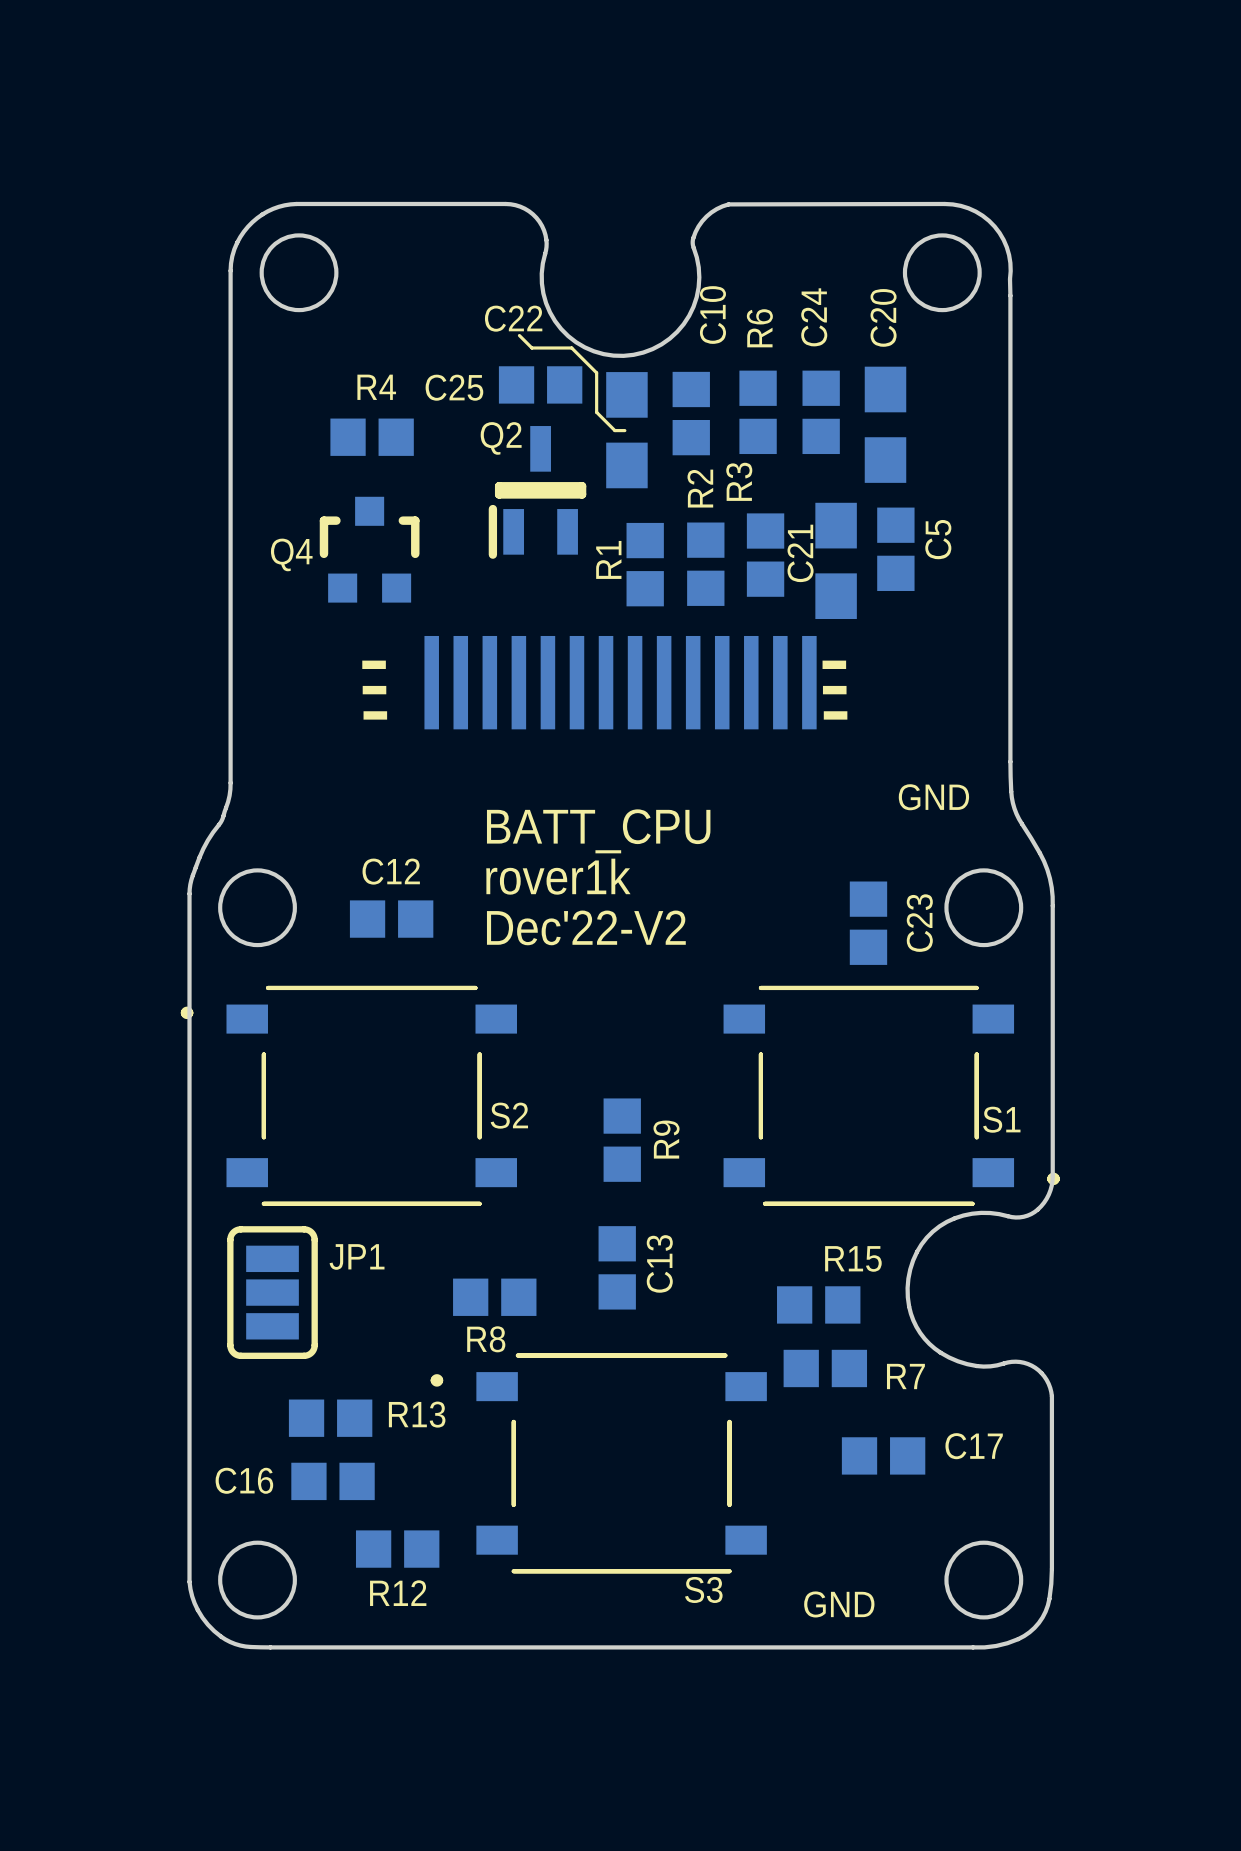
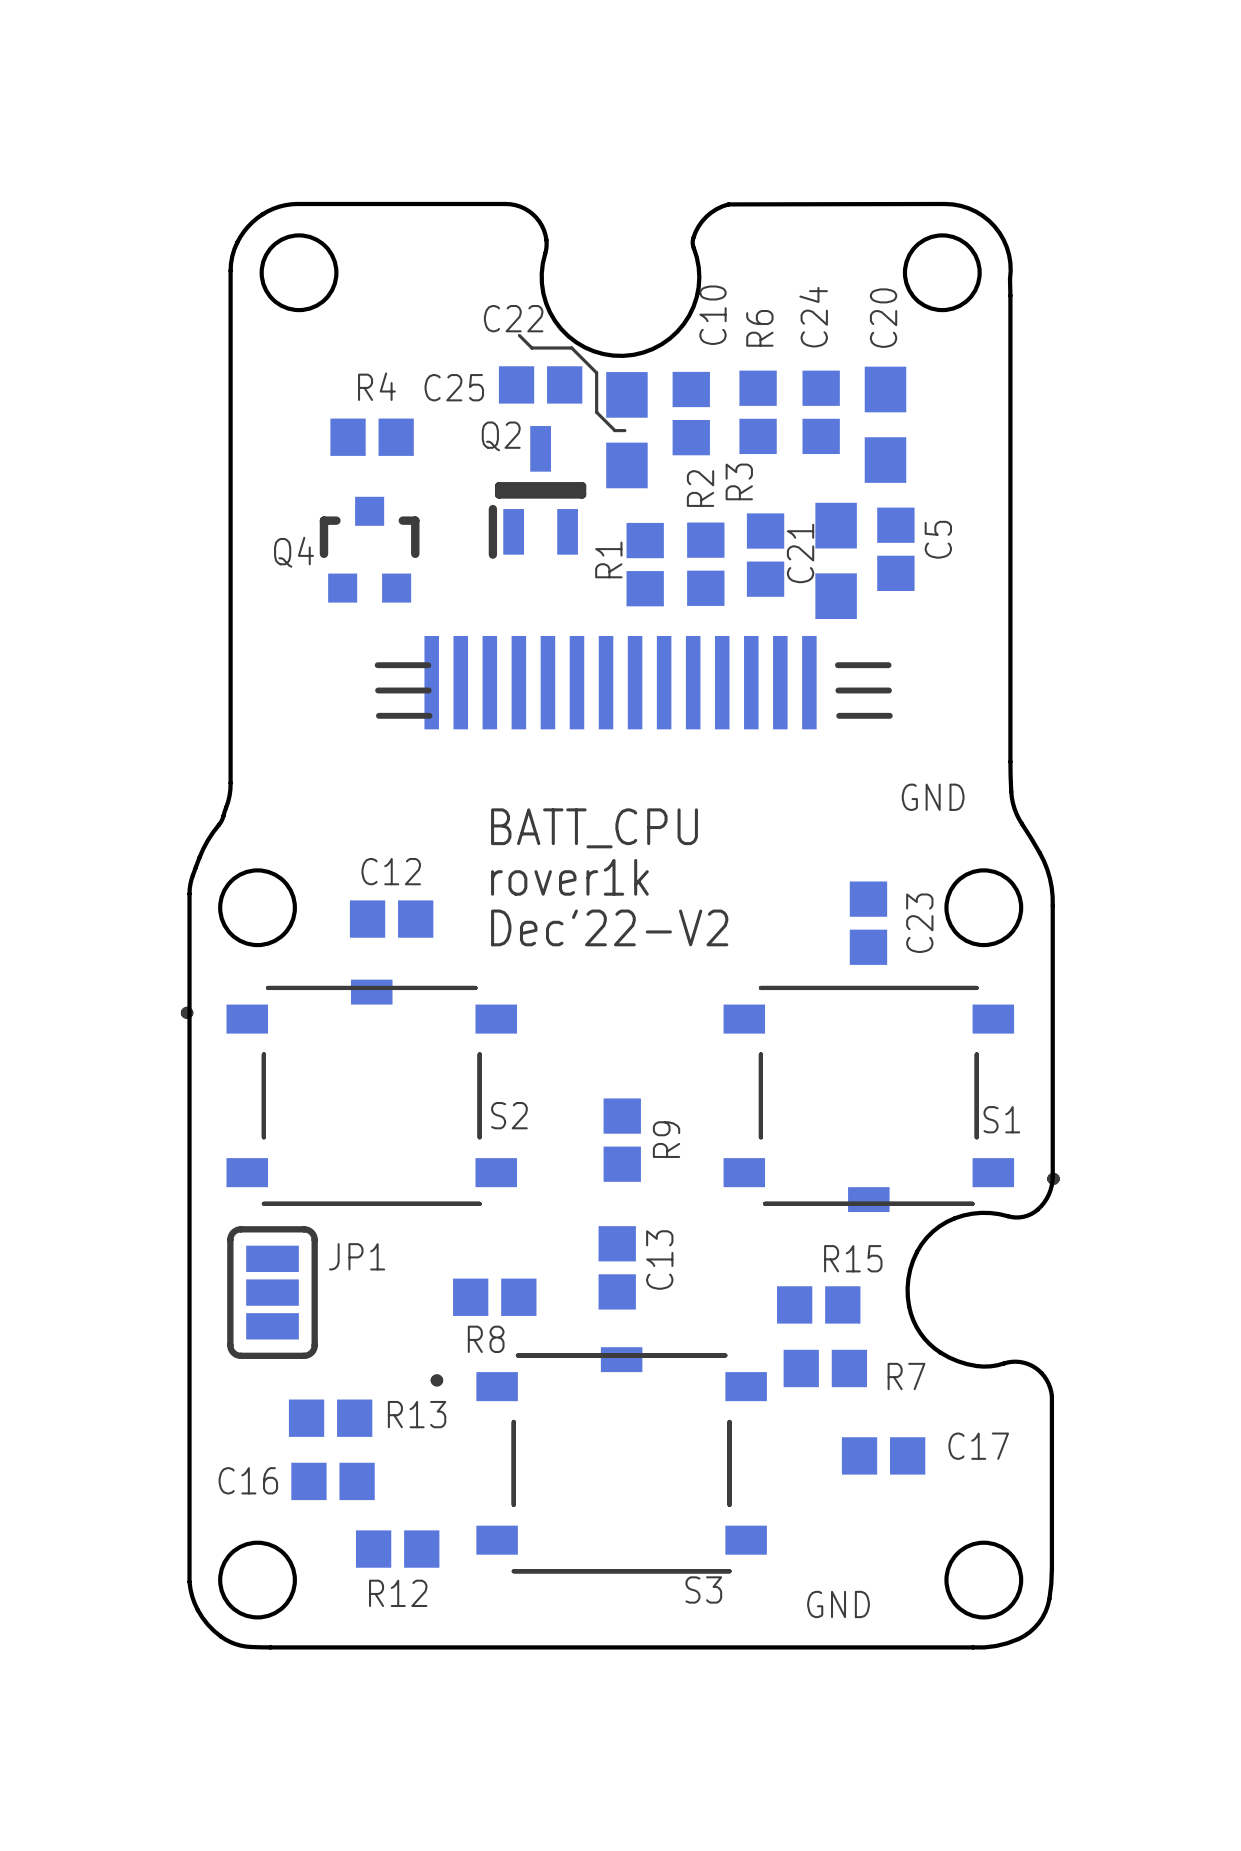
S2 footprint: [180, 985, 518, 1206] -> [180, 979, 518, 1206]
S1 footprint: [723, 985, 1060, 1206] -> [723, 985, 1060, 1213]
S3 footprint: [430, 1353, 767, 1574] -> [430, 1347, 767, 1574]

